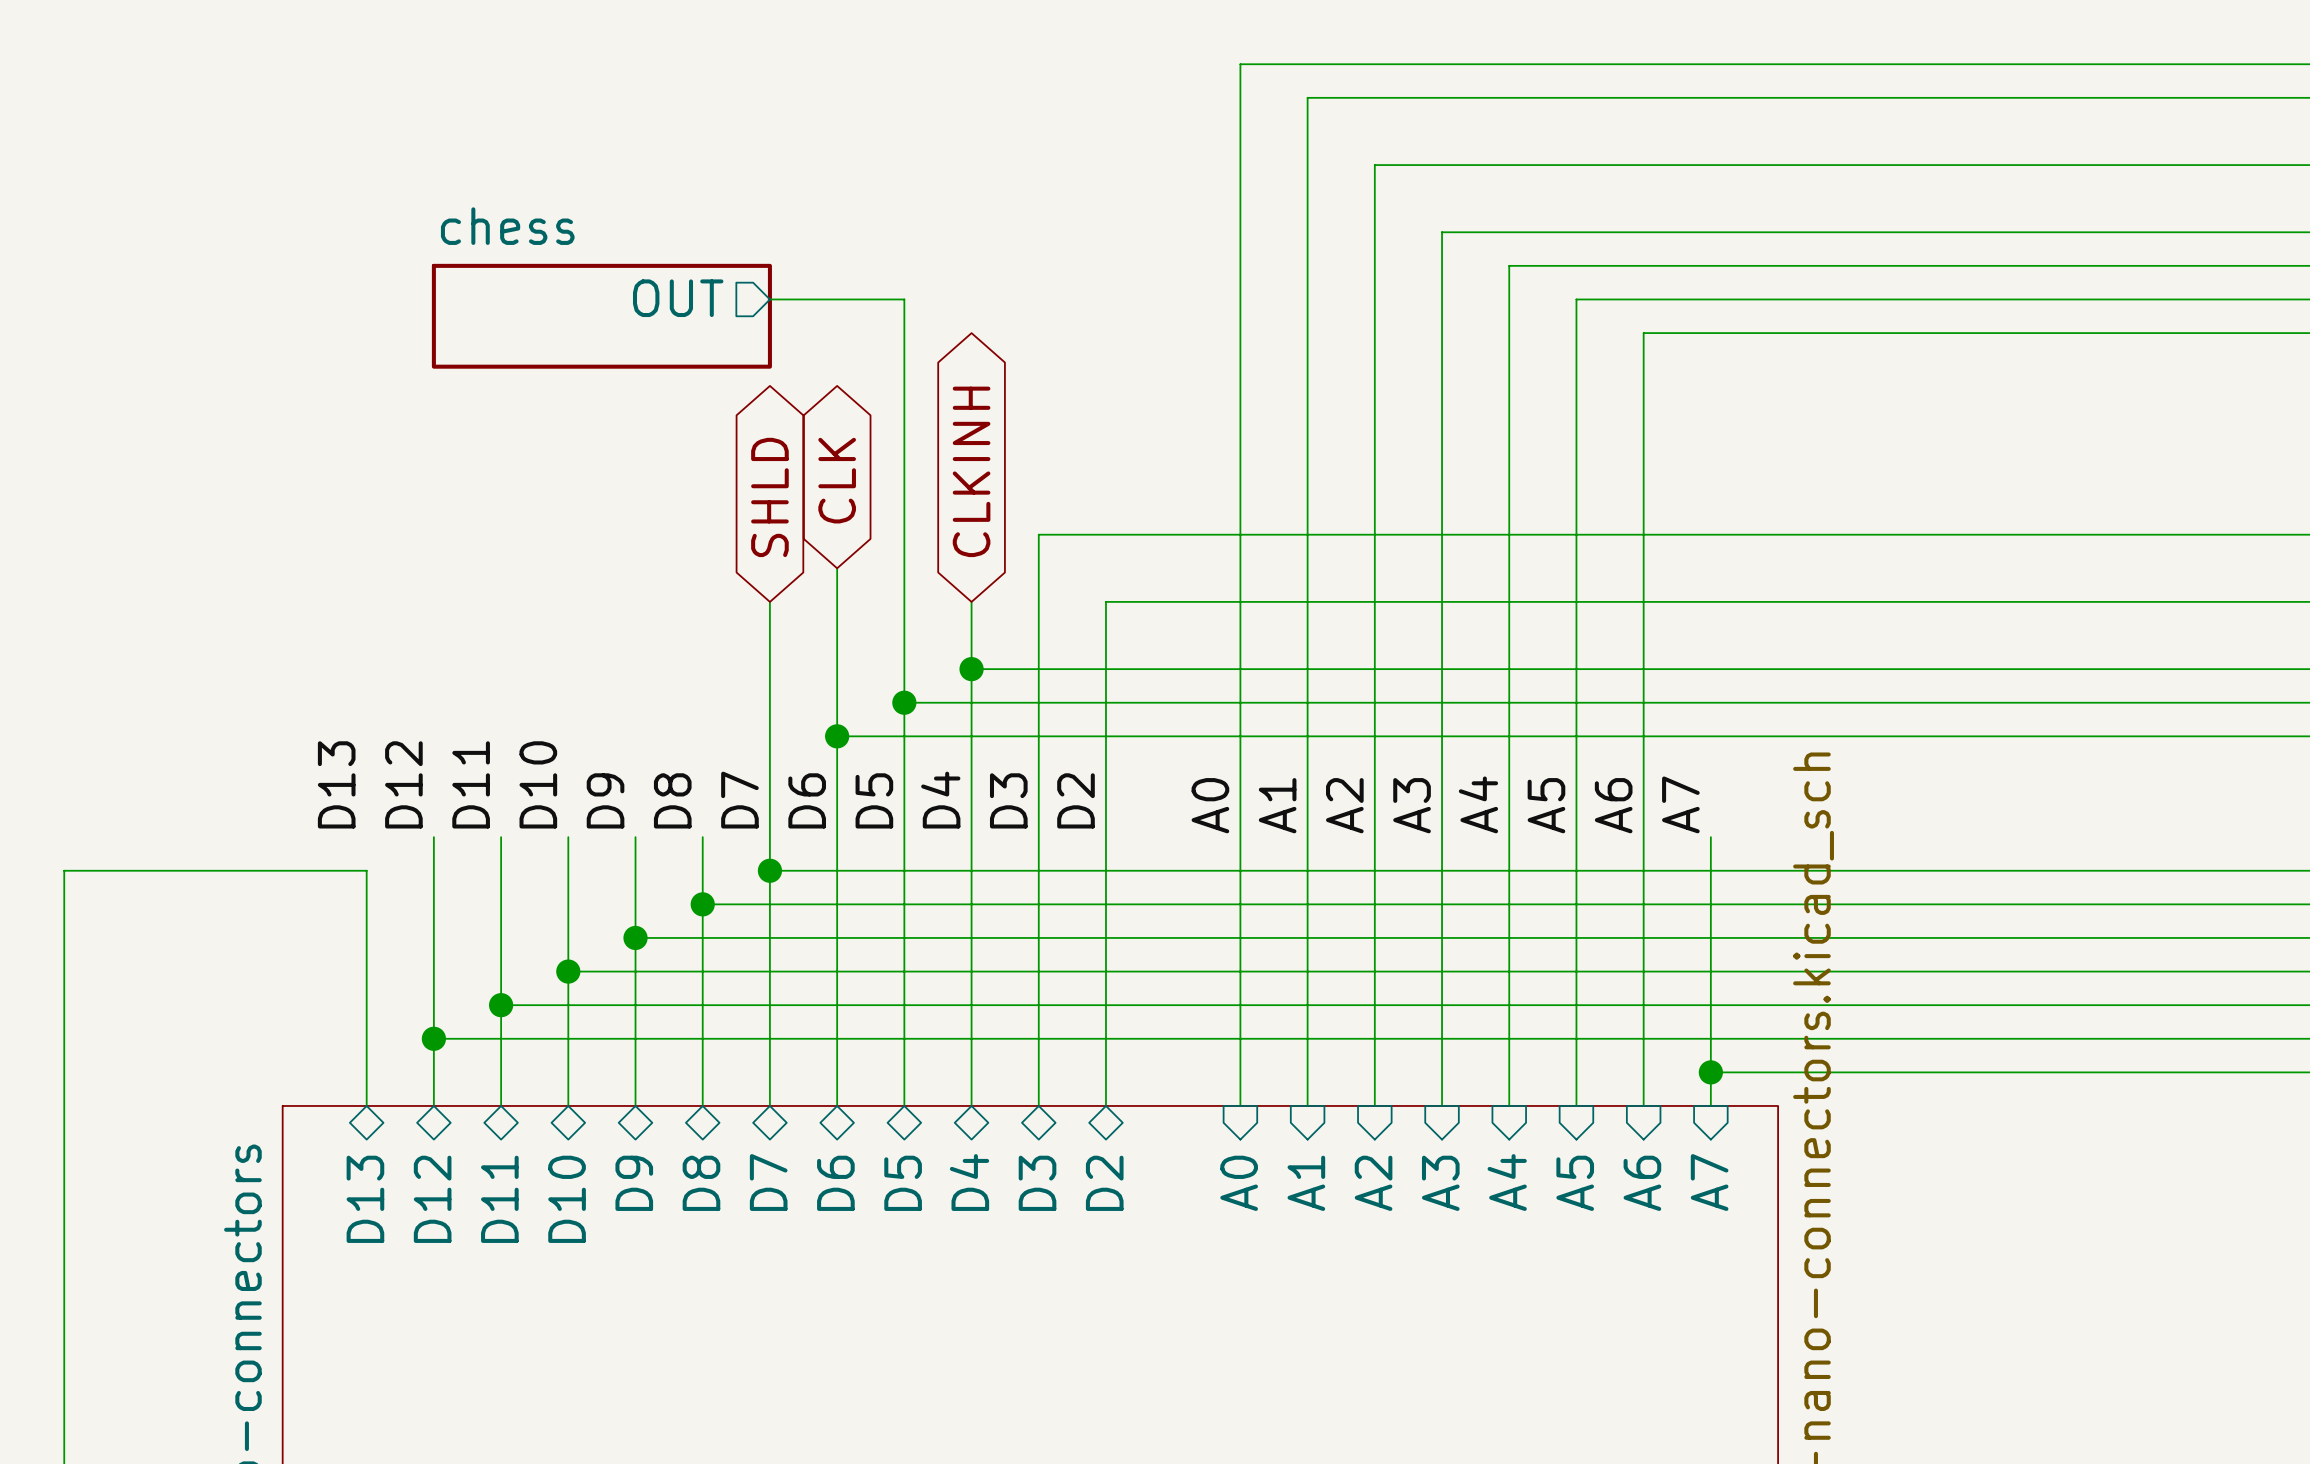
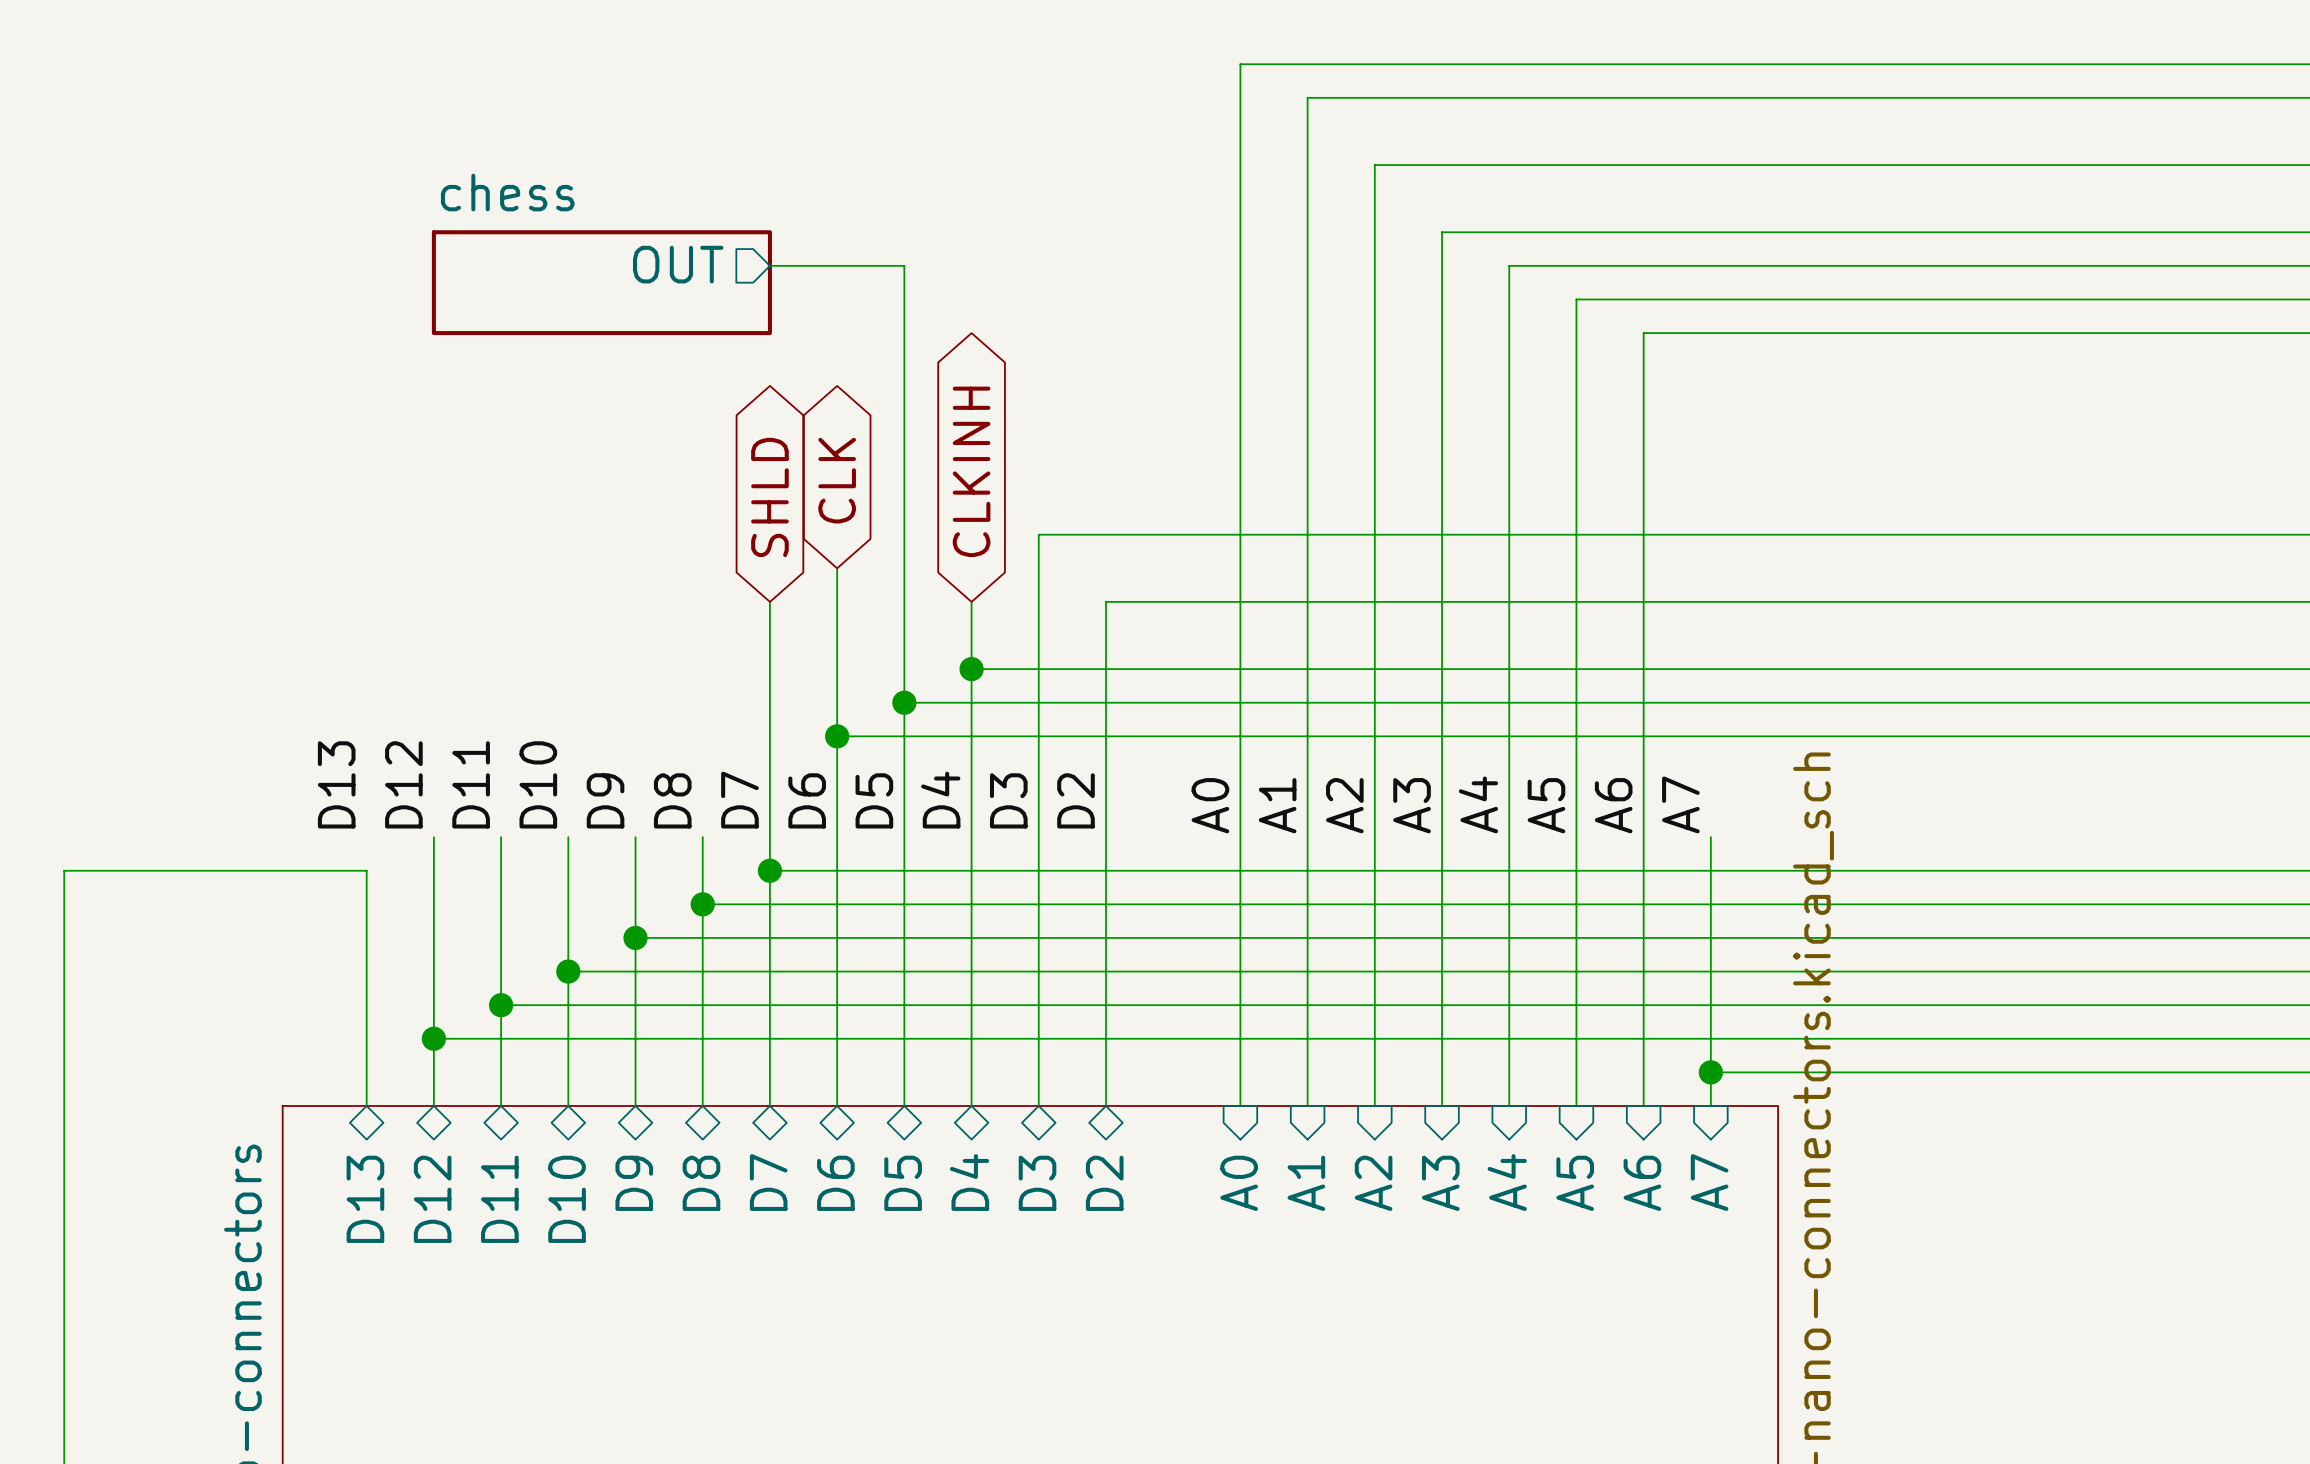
sheet pin position: OUT (678, 298) -> OUT (678, 264)
wire: (769, 299) (904, 299) -> (769, 265) (904, 265) (904, 299)
sheet chess position: (601, 316) -> (601, 282)

